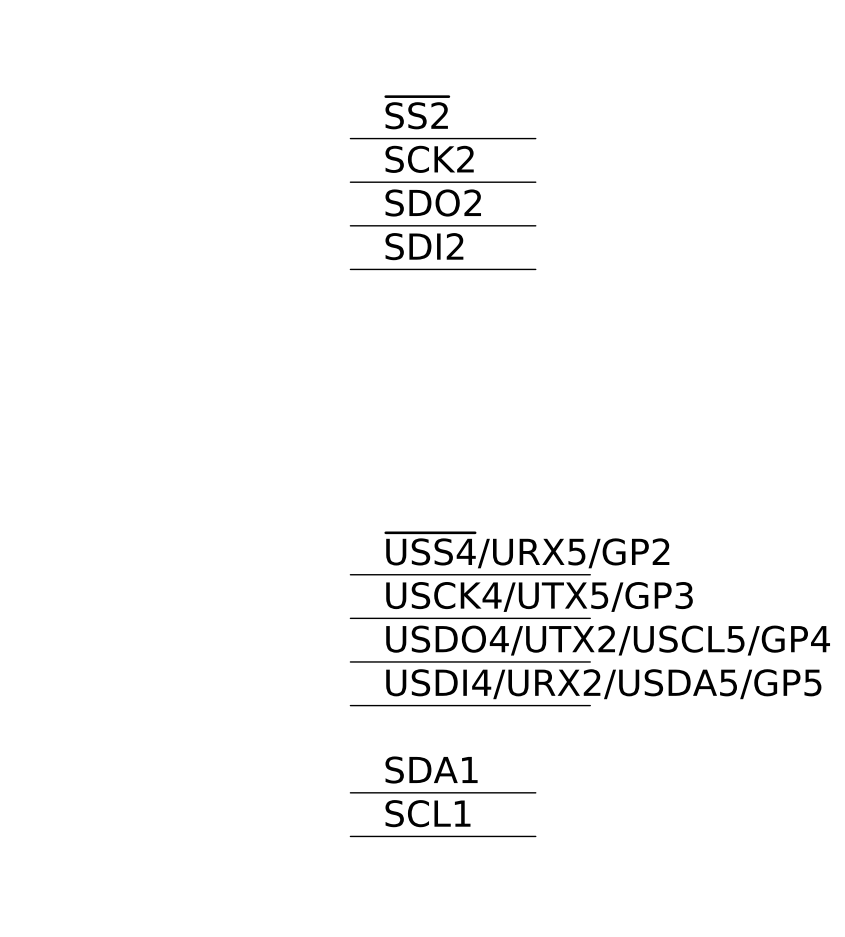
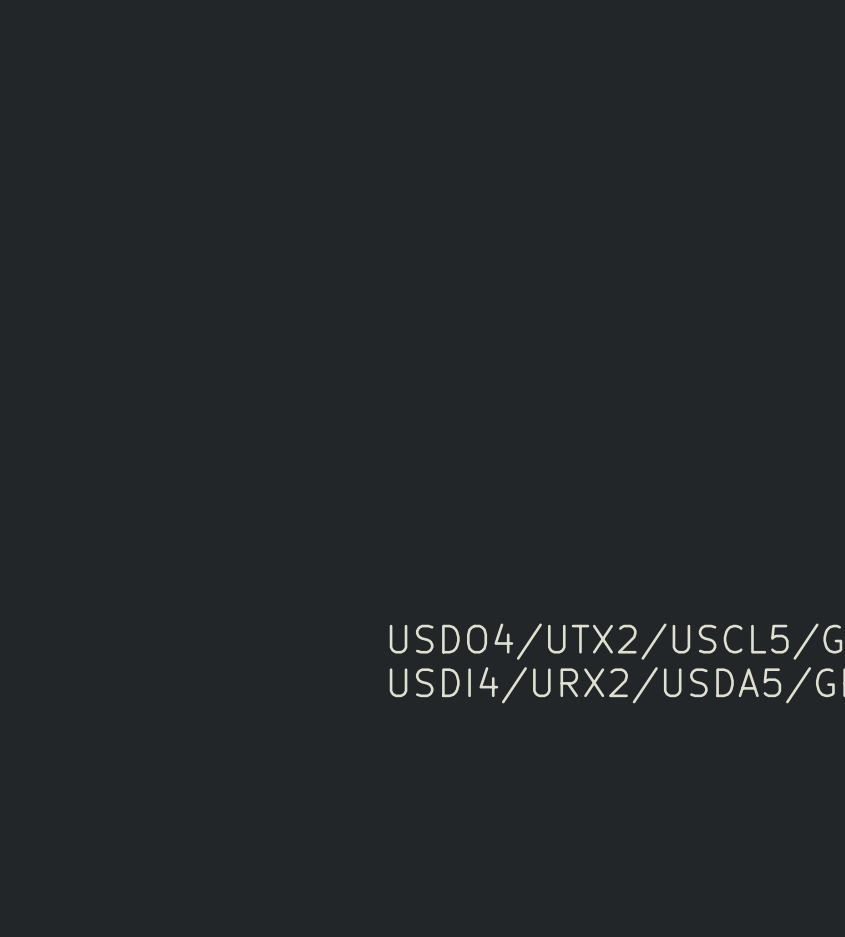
label: ~{SS2} (417, 112) -> none
wire: (350, 138) (535, 138) -> none
label: SCK2 (429, 159) -> none
wire: (350, 182) (535, 182) -> none
label: SDO2 (433, 203) -> none
wire: (350, 225) (535, 225) -> none
label: SDI2 (424, 246) -> none
wire: (350, 269) (535, 269) -> none
label: ~{USS4}/URX5/GP2 (527, 550) -> none
wire: (350, 574) (590, 574) -> none
label: USCK4/UTX5/GP3 (539, 596) -> none
wire: (350, 618) (590, 618) -> none
wire: (350, 661) (590, 661) -> none
wire: (350, 705) (590, 705) -> none
label: SDA1 (431, 770) -> none
wire: (350, 792) (535, 792) -> none
label: SCL1 (427, 813) -> none
wire: (350, 836) (535, 836) -> none

